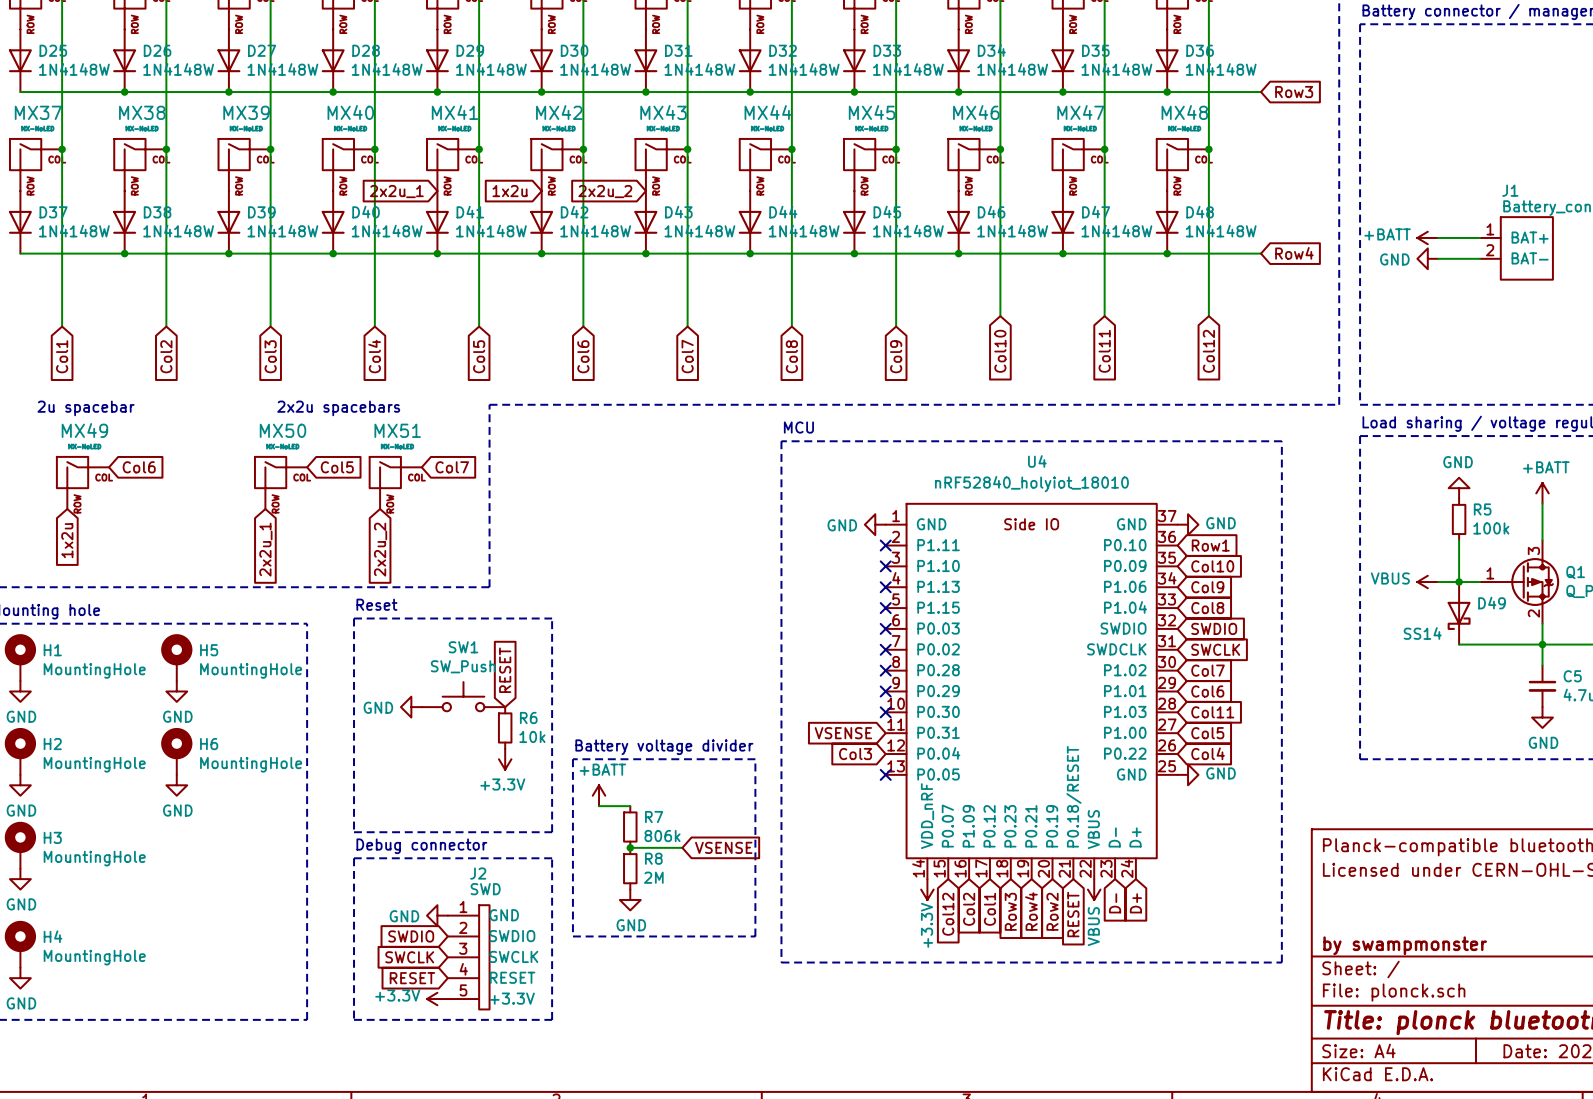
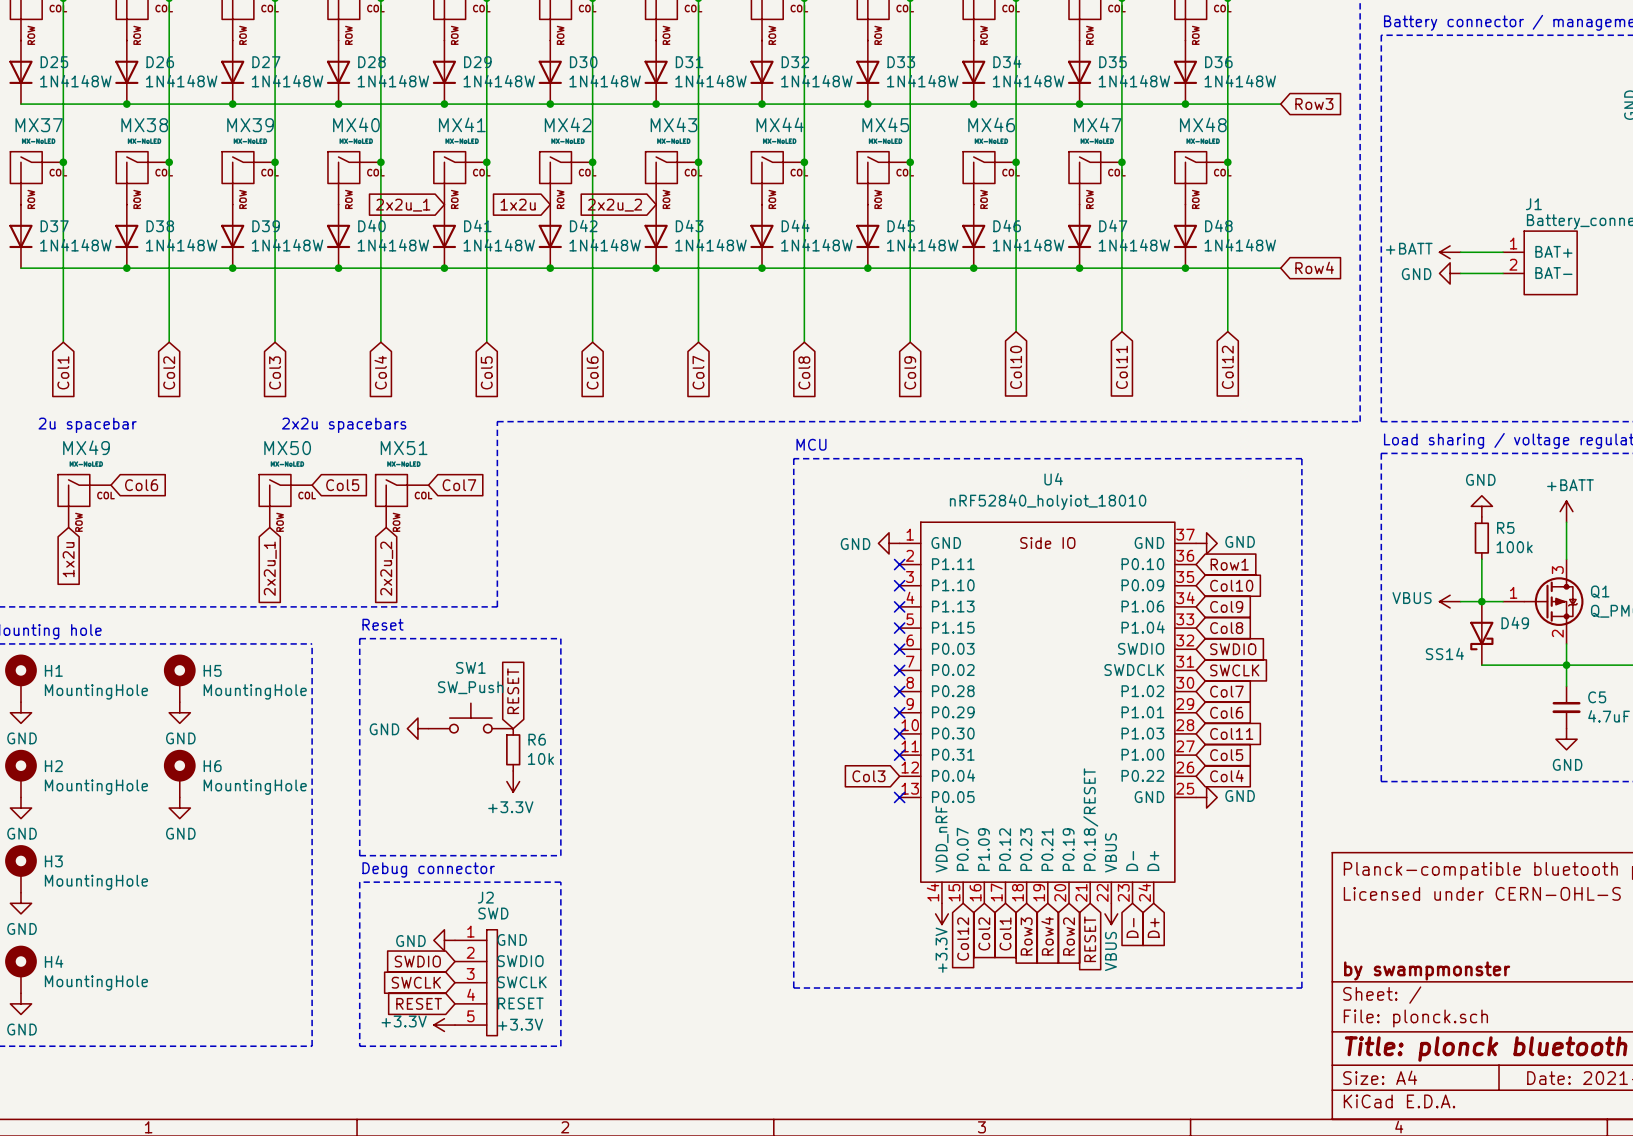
global label: VSENSE (843, 733) -> none
no-connect mark: none -> (899, 755)
text: Battery voltage divider (664, 747) -> none
line: (572, 759) (572, 936) (755, 936) (755, 759) (572, 759) -> none
power symbol: +BATT (599, 795) -> none
wire: (599, 806) (630, 806) -> none
R7: 806k (630, 827) -> none
wire: (630, 847) (682, 847) -> none
junction: (630, 847) -> none
global label: VSENSE (723, 847) -> none
R8: 2M (630, 868) -> none
power symbol: GND (630, 899) -> none

